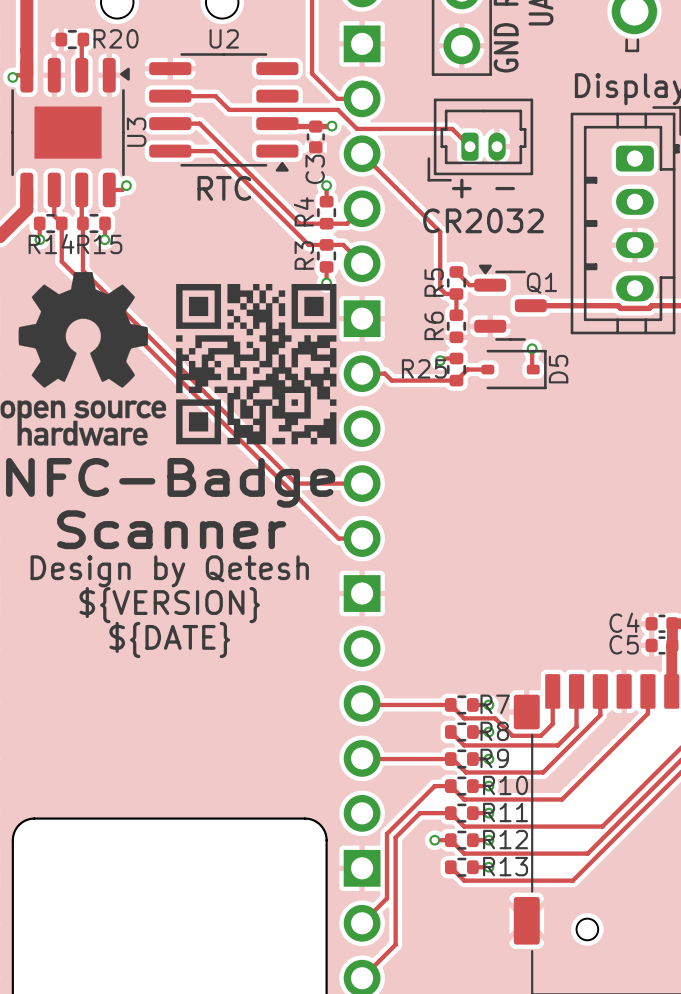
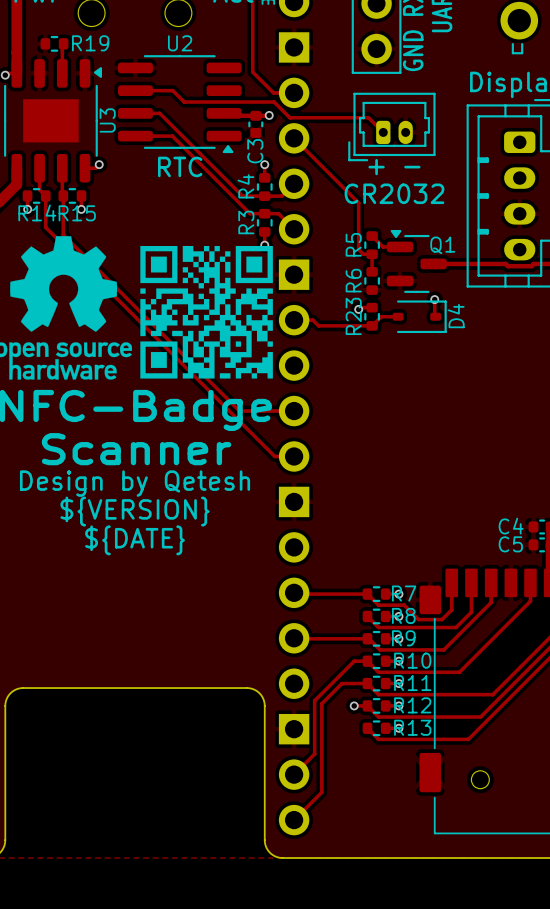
R20 name: R20 (116, 38) -> R19 (90, 43)
R25 name: R25 (424, 368) -> R23 (353, 316)
D5 name: D5 (558, 369) -> D4 (456, 316)

